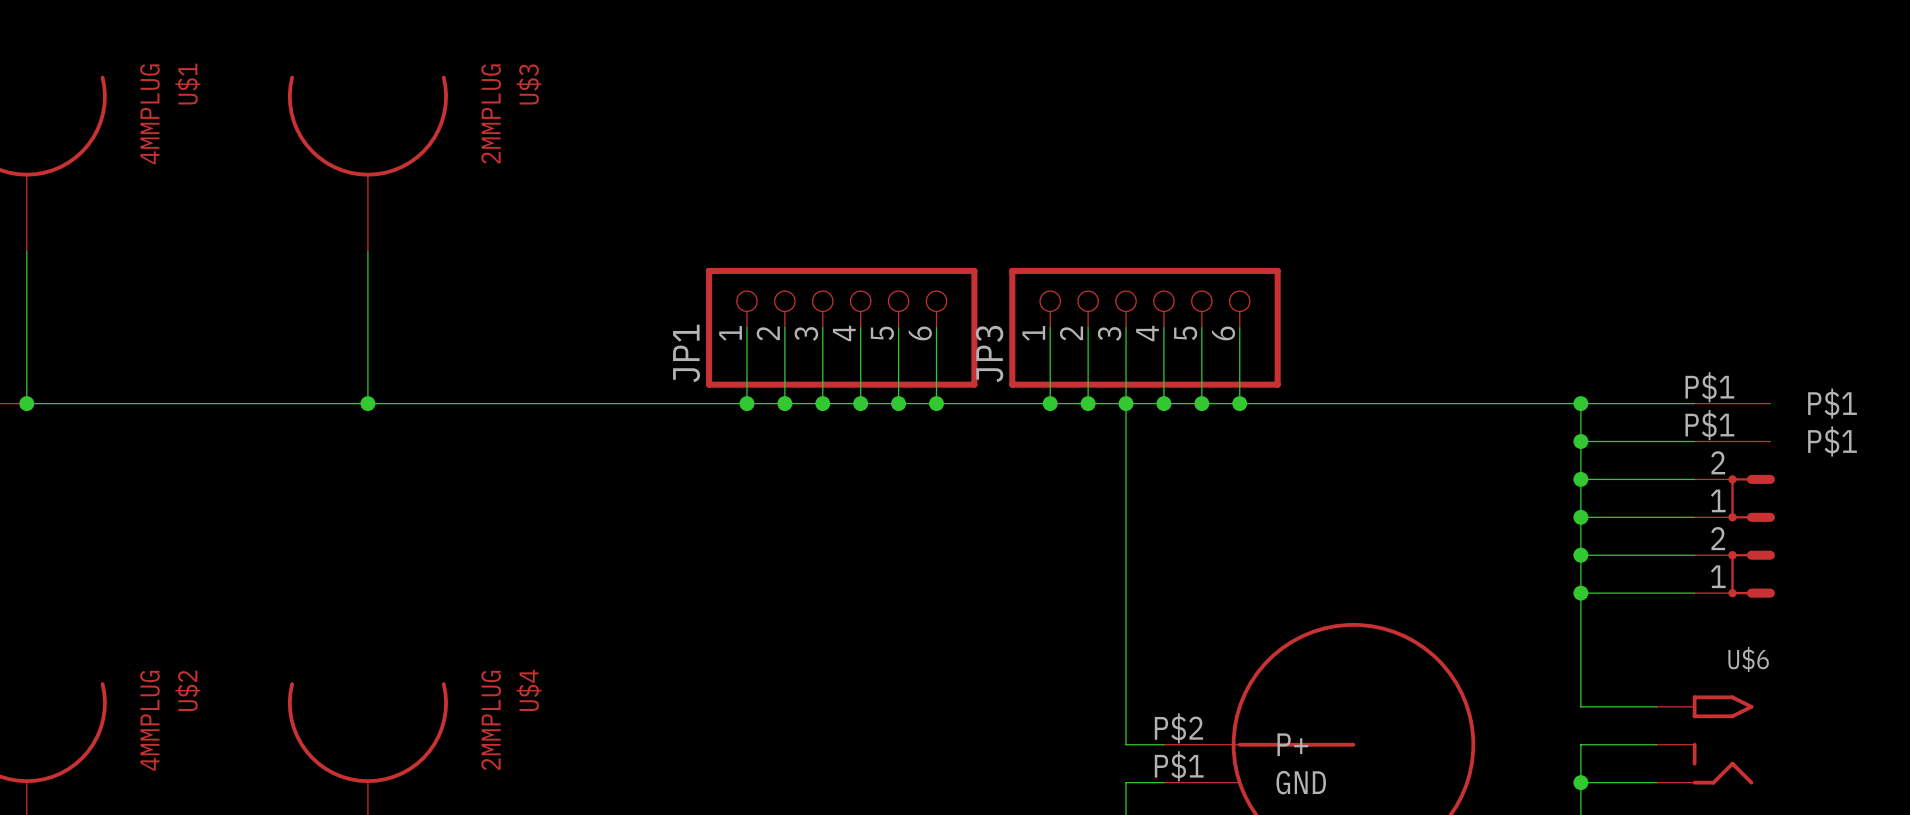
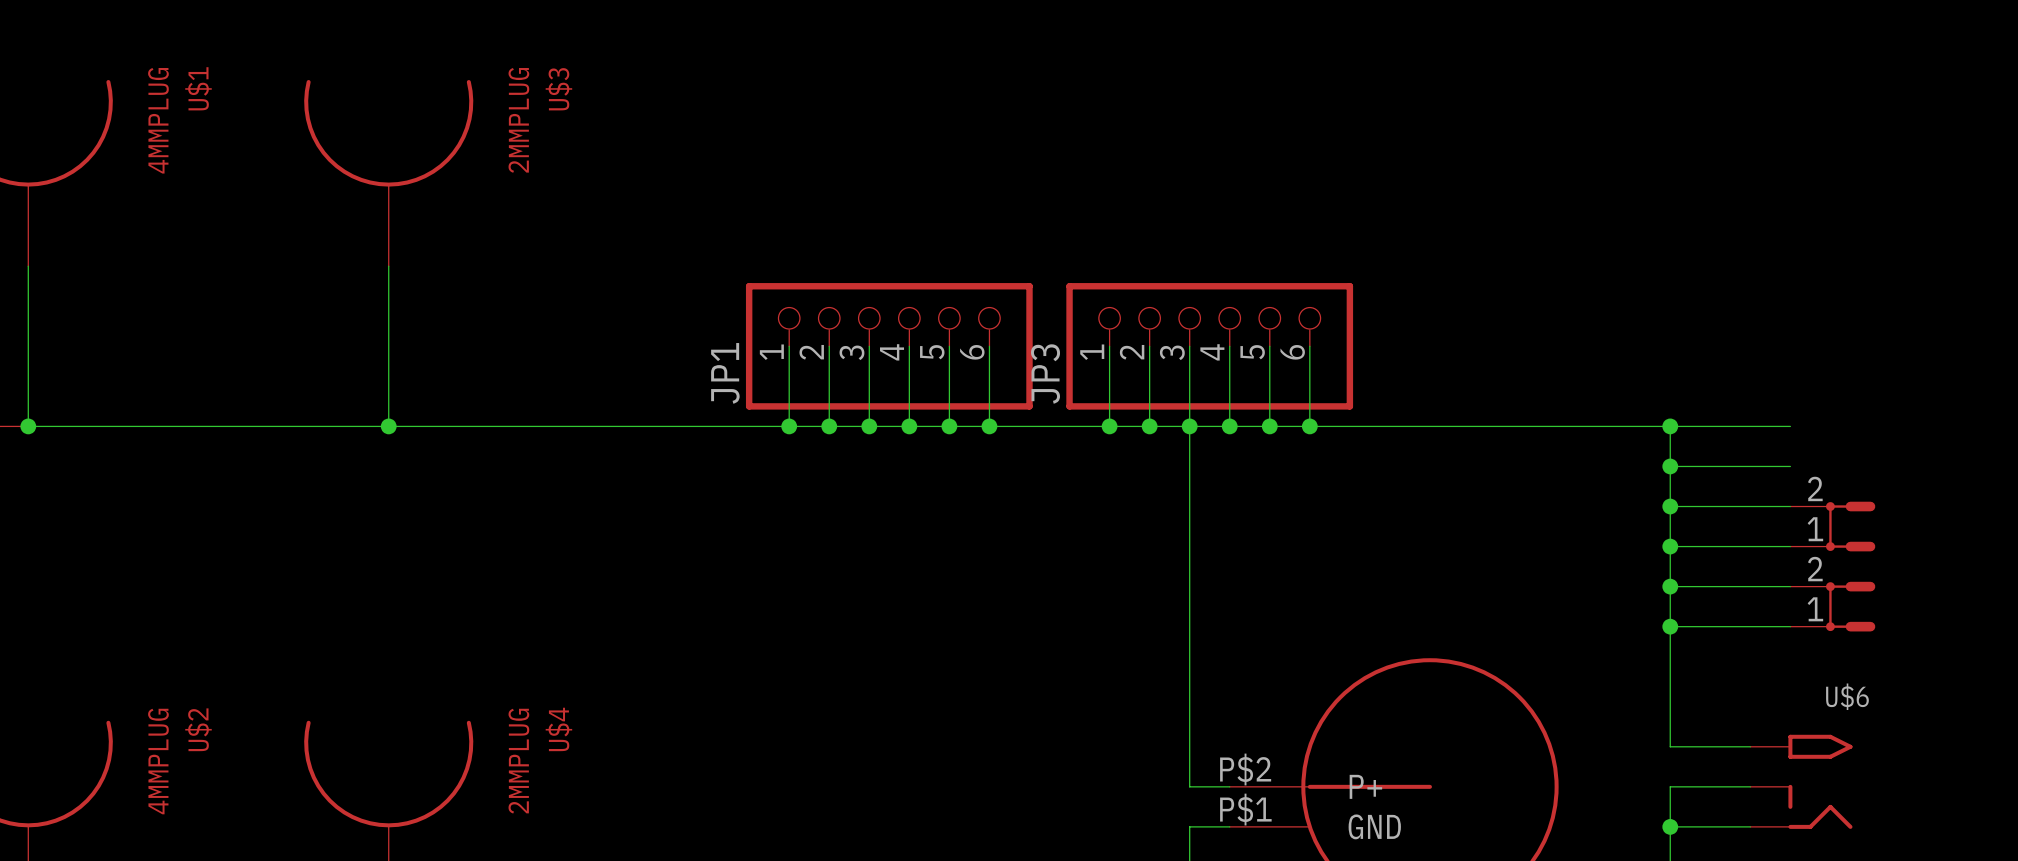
part: (1732, 403) -> none
part: (1732, 441) -> none

